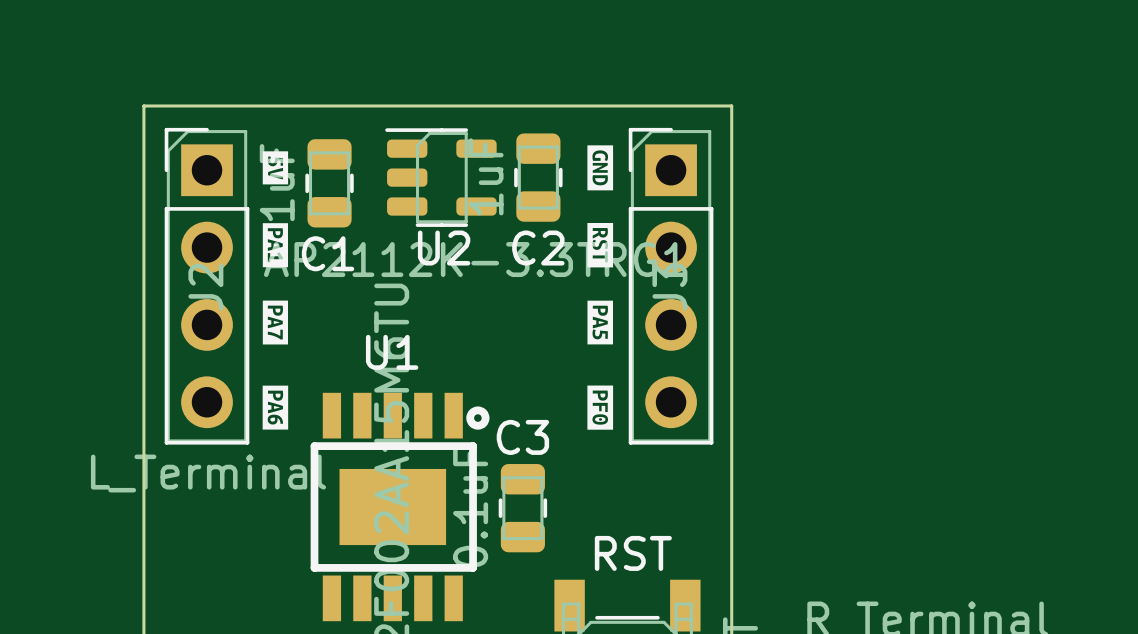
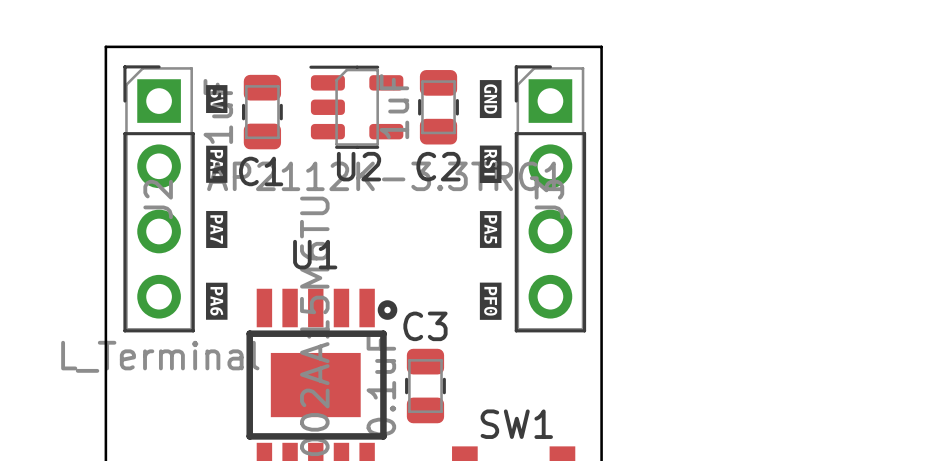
RST name: RST (633, 553) -> SW1 (516, 424)

